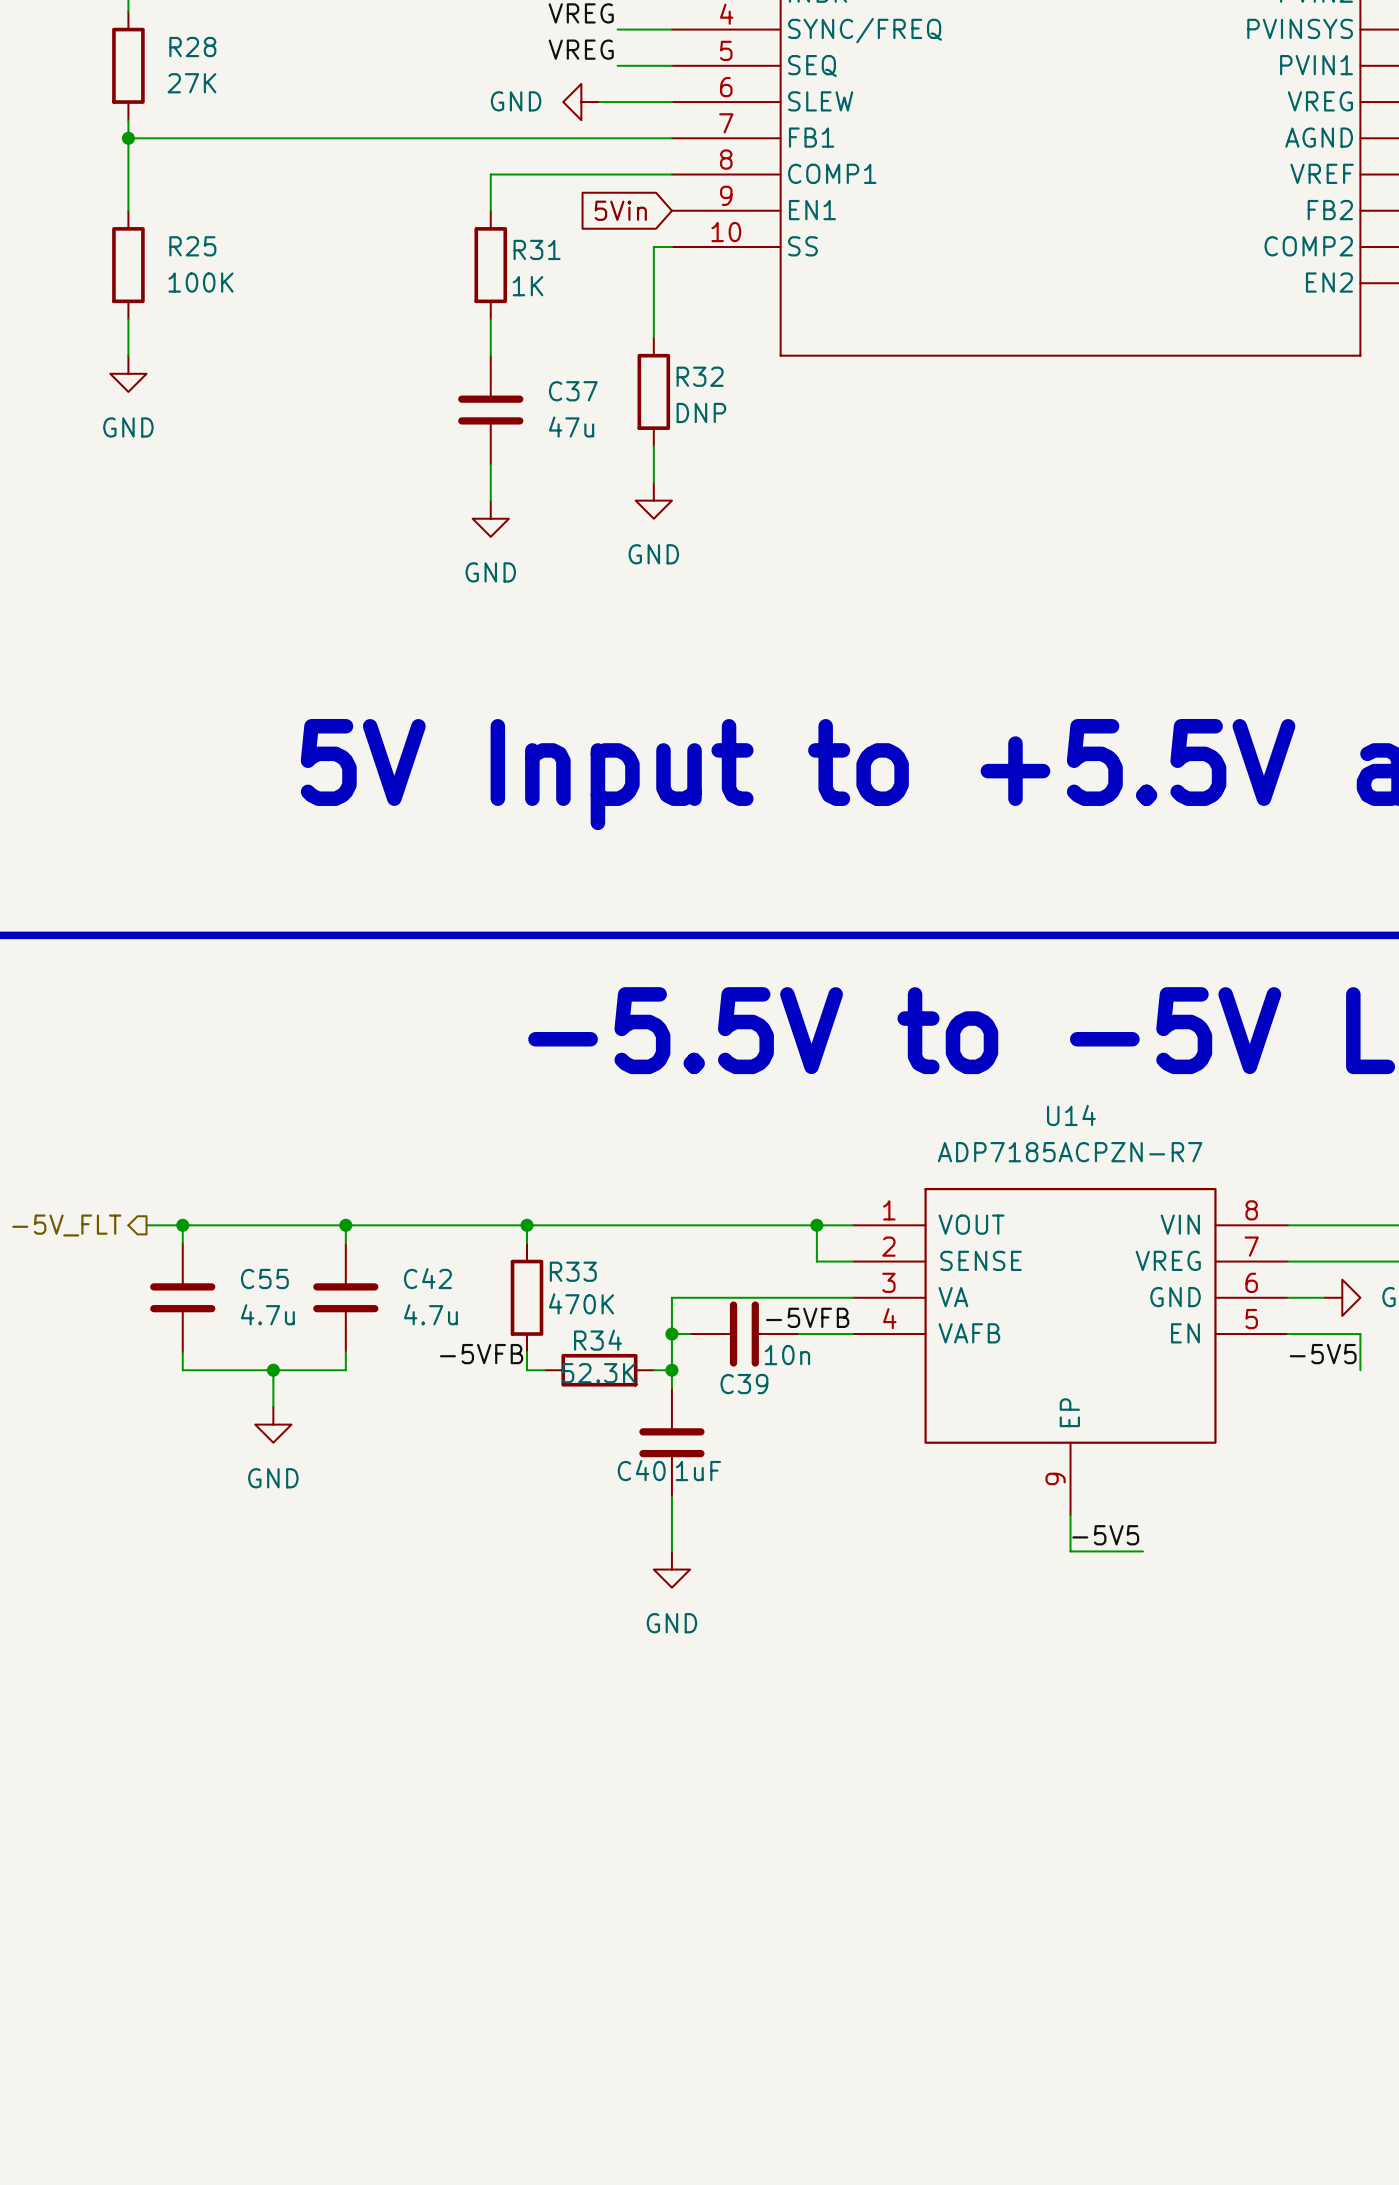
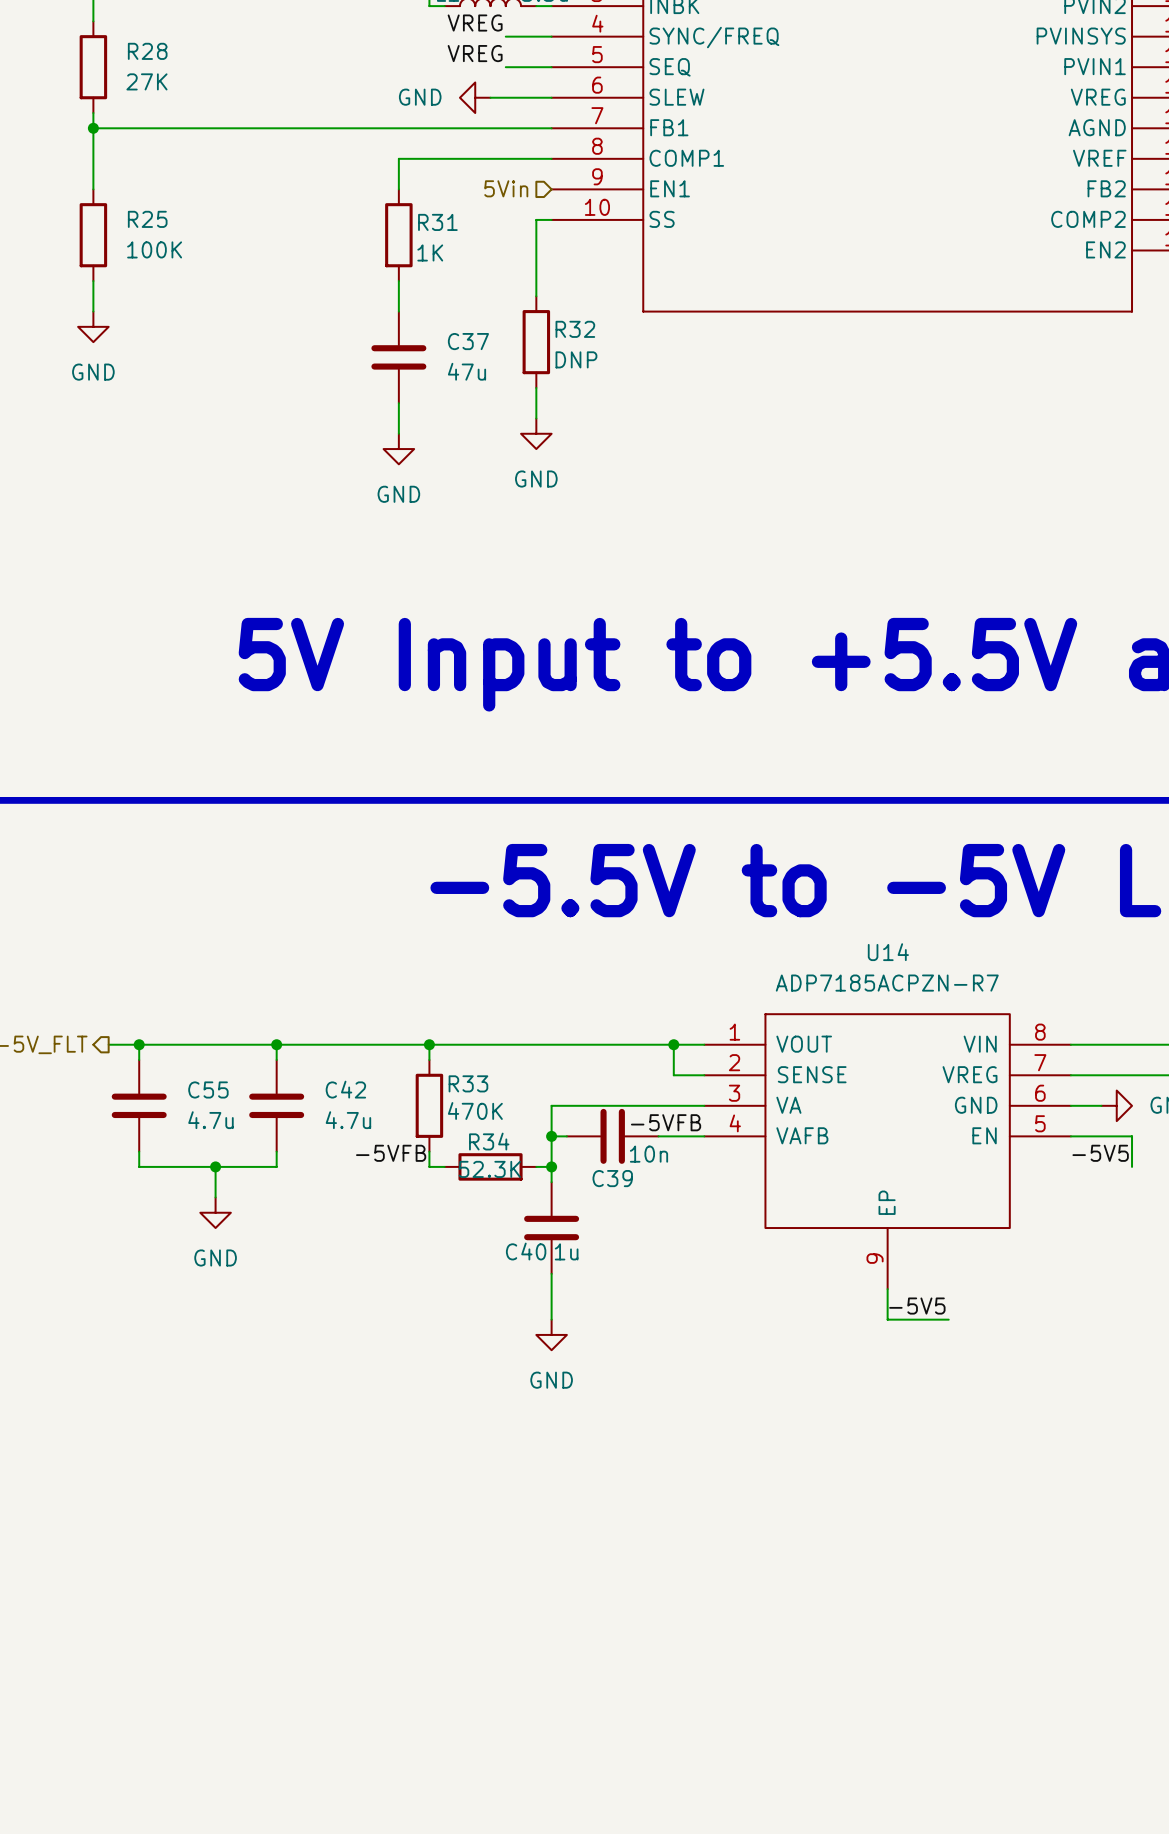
hierarchical label: none -> 5Vin (506, 188)
global label: 5Vin (620, 210) -> none
C40 value: 1uF (698, 1471) -> 1u (566, 1251)

